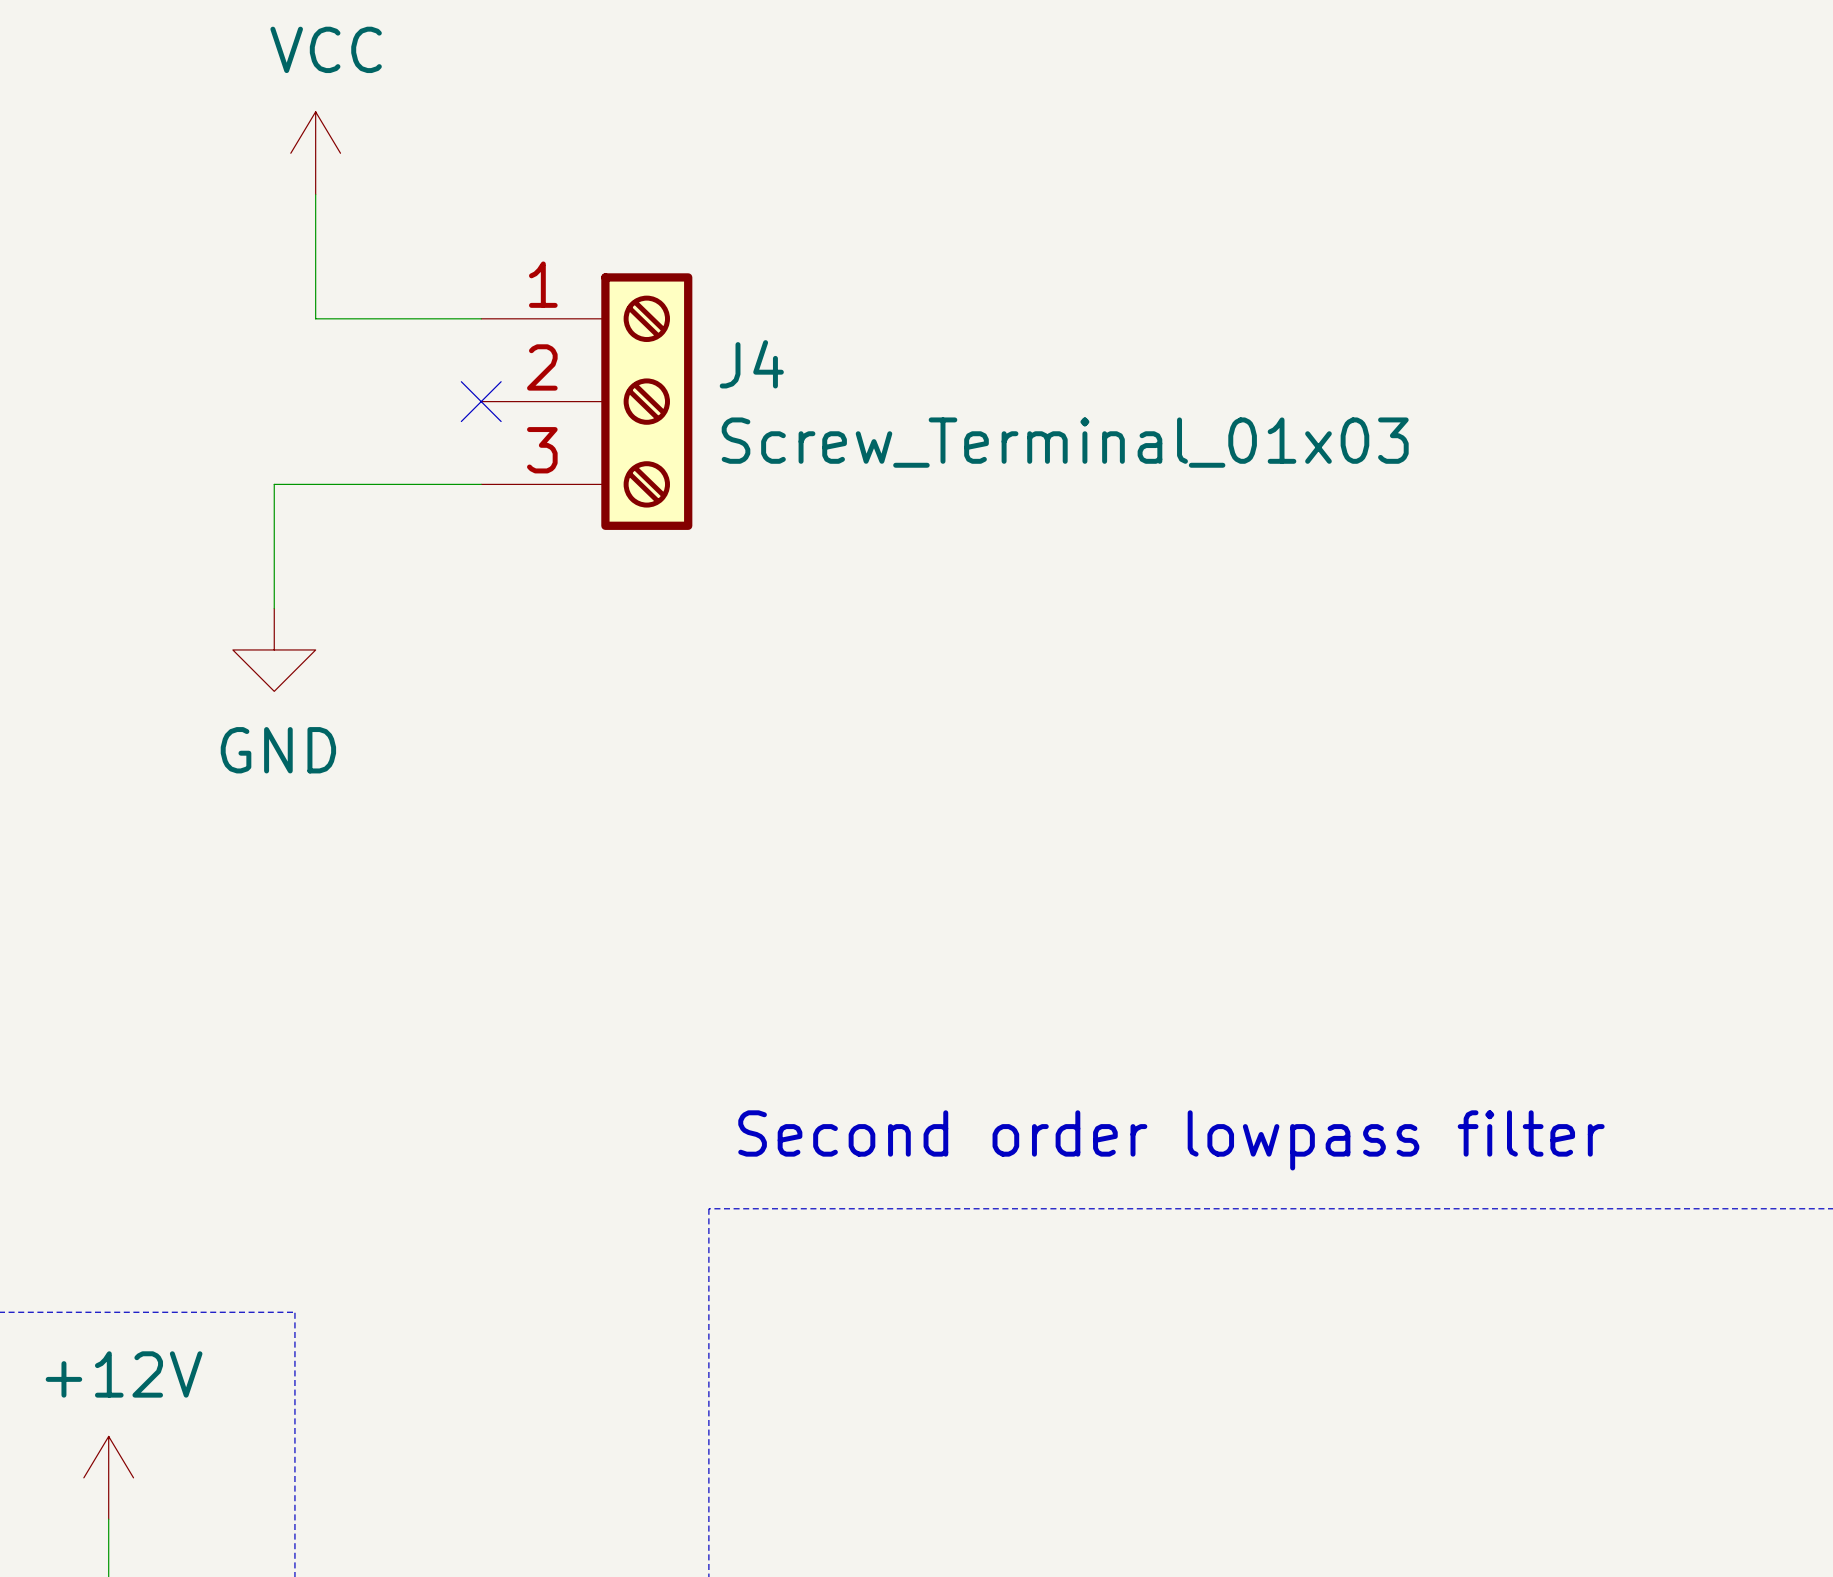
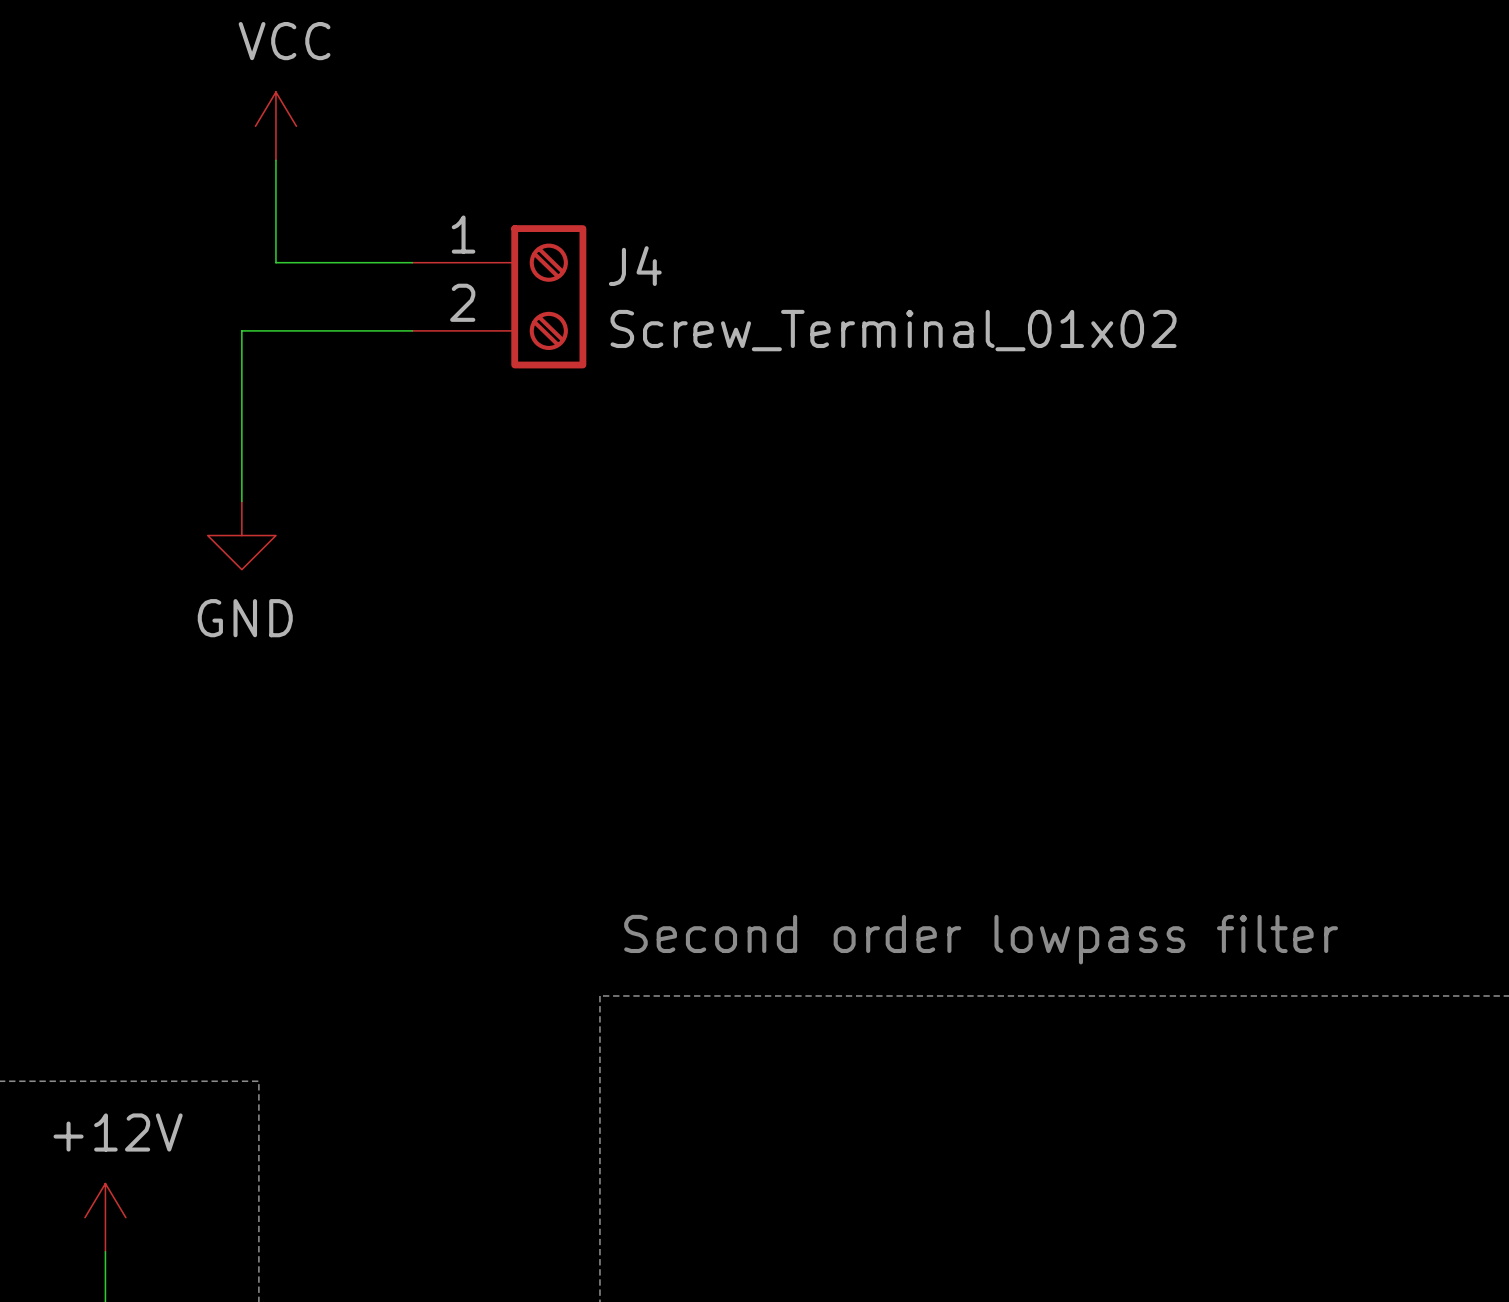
J4 symbol: [481, 273, 693, 530] -> [412, 225, 587, 369]
no-connect mark: (481, 401) -> none
J4 value: Screw_Terminal_01x03 (1065, 442) -> Screw_Terminal_01x02 (893, 330)
wire: (274, 484) (481, 484) -> (241, 399) (241, 330) (412, 330)

